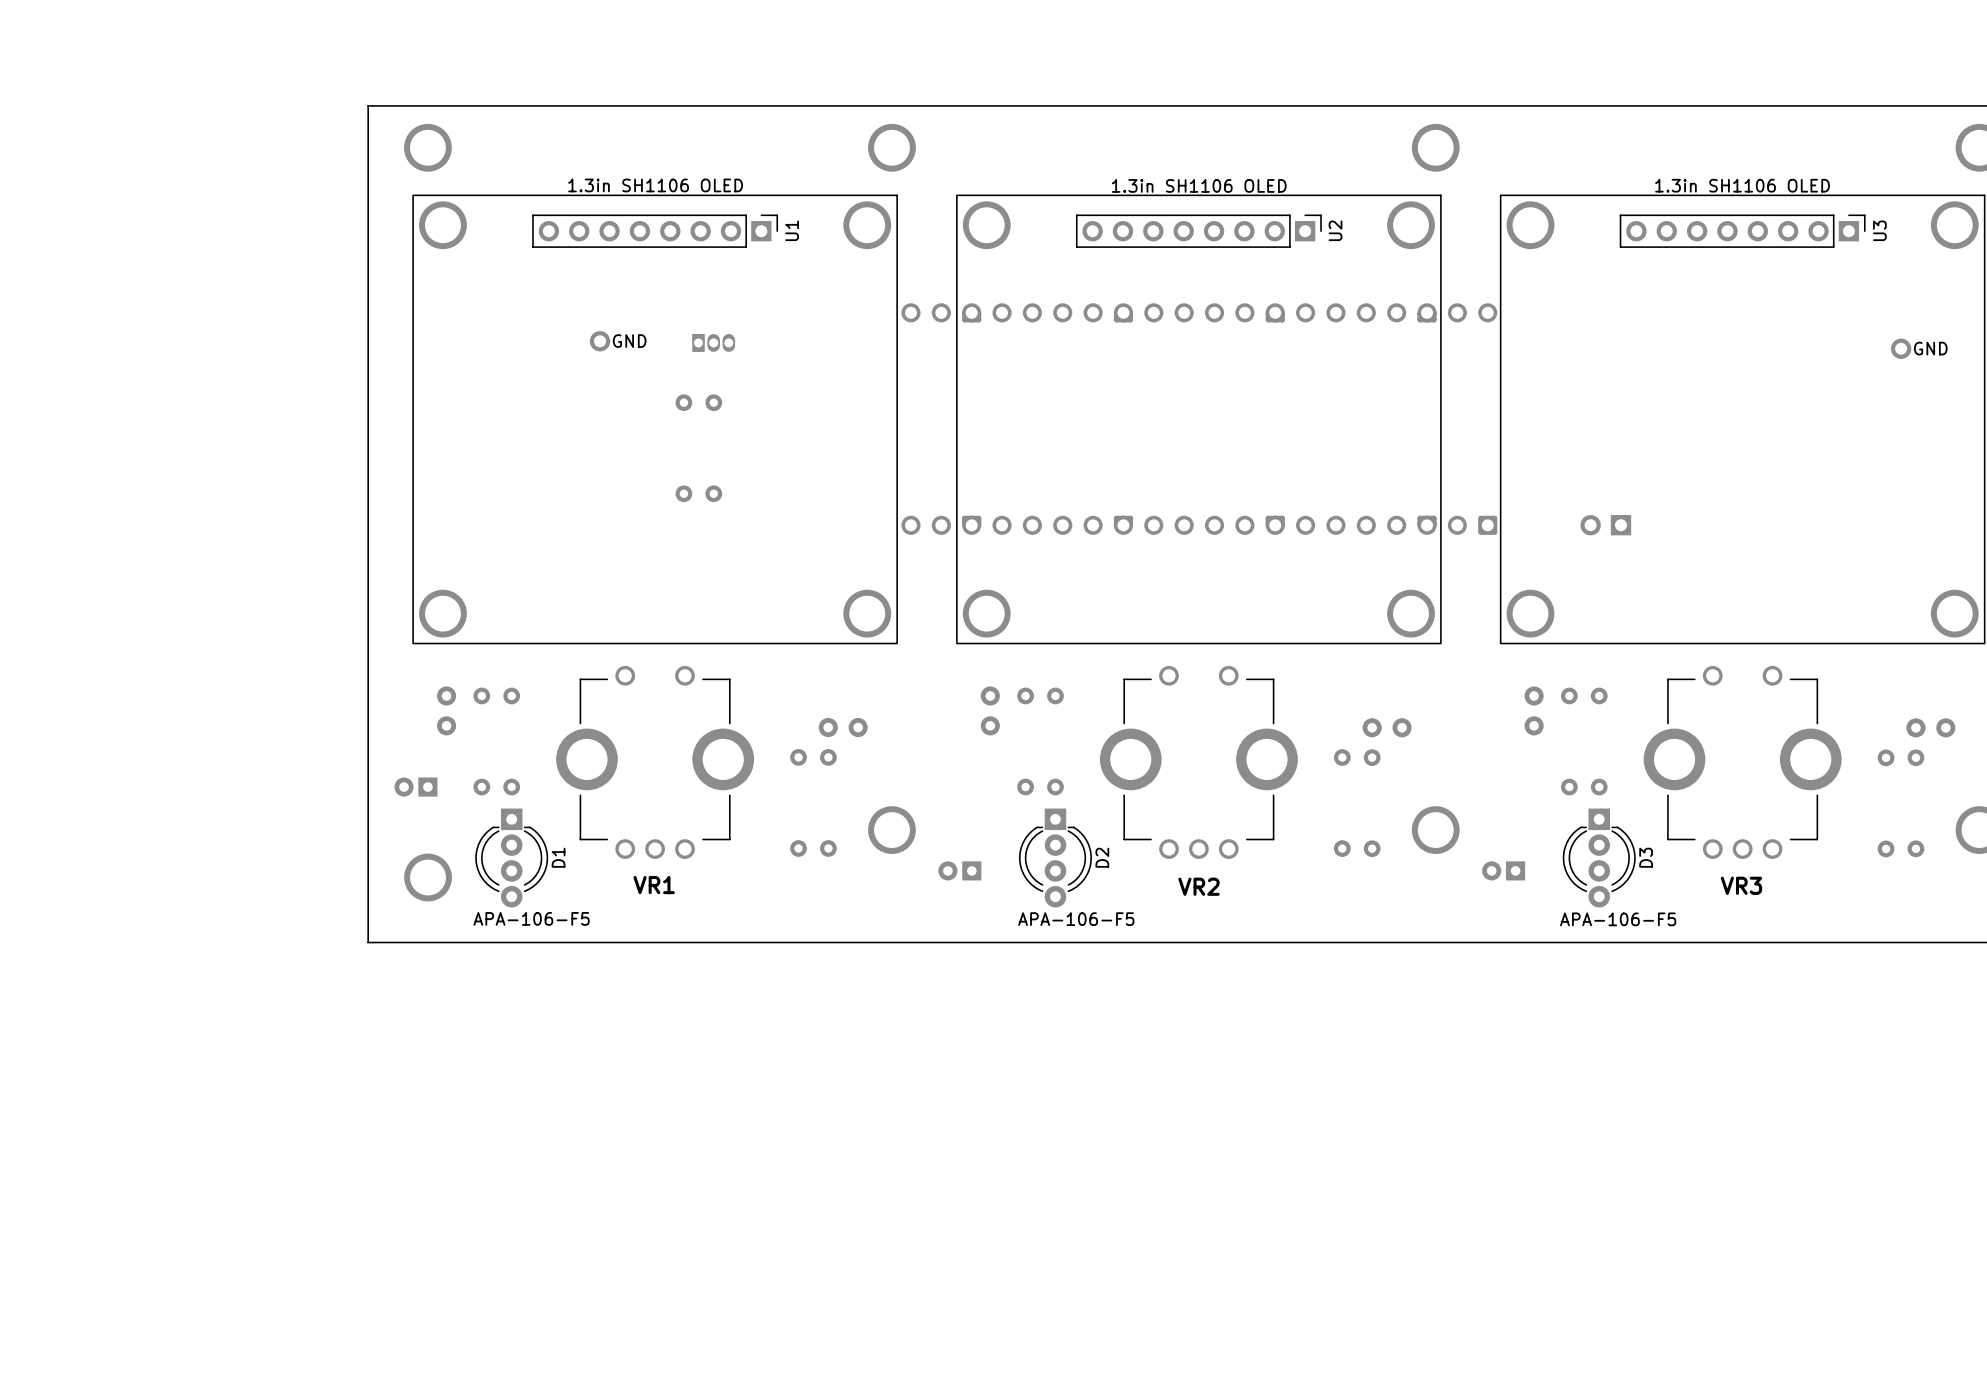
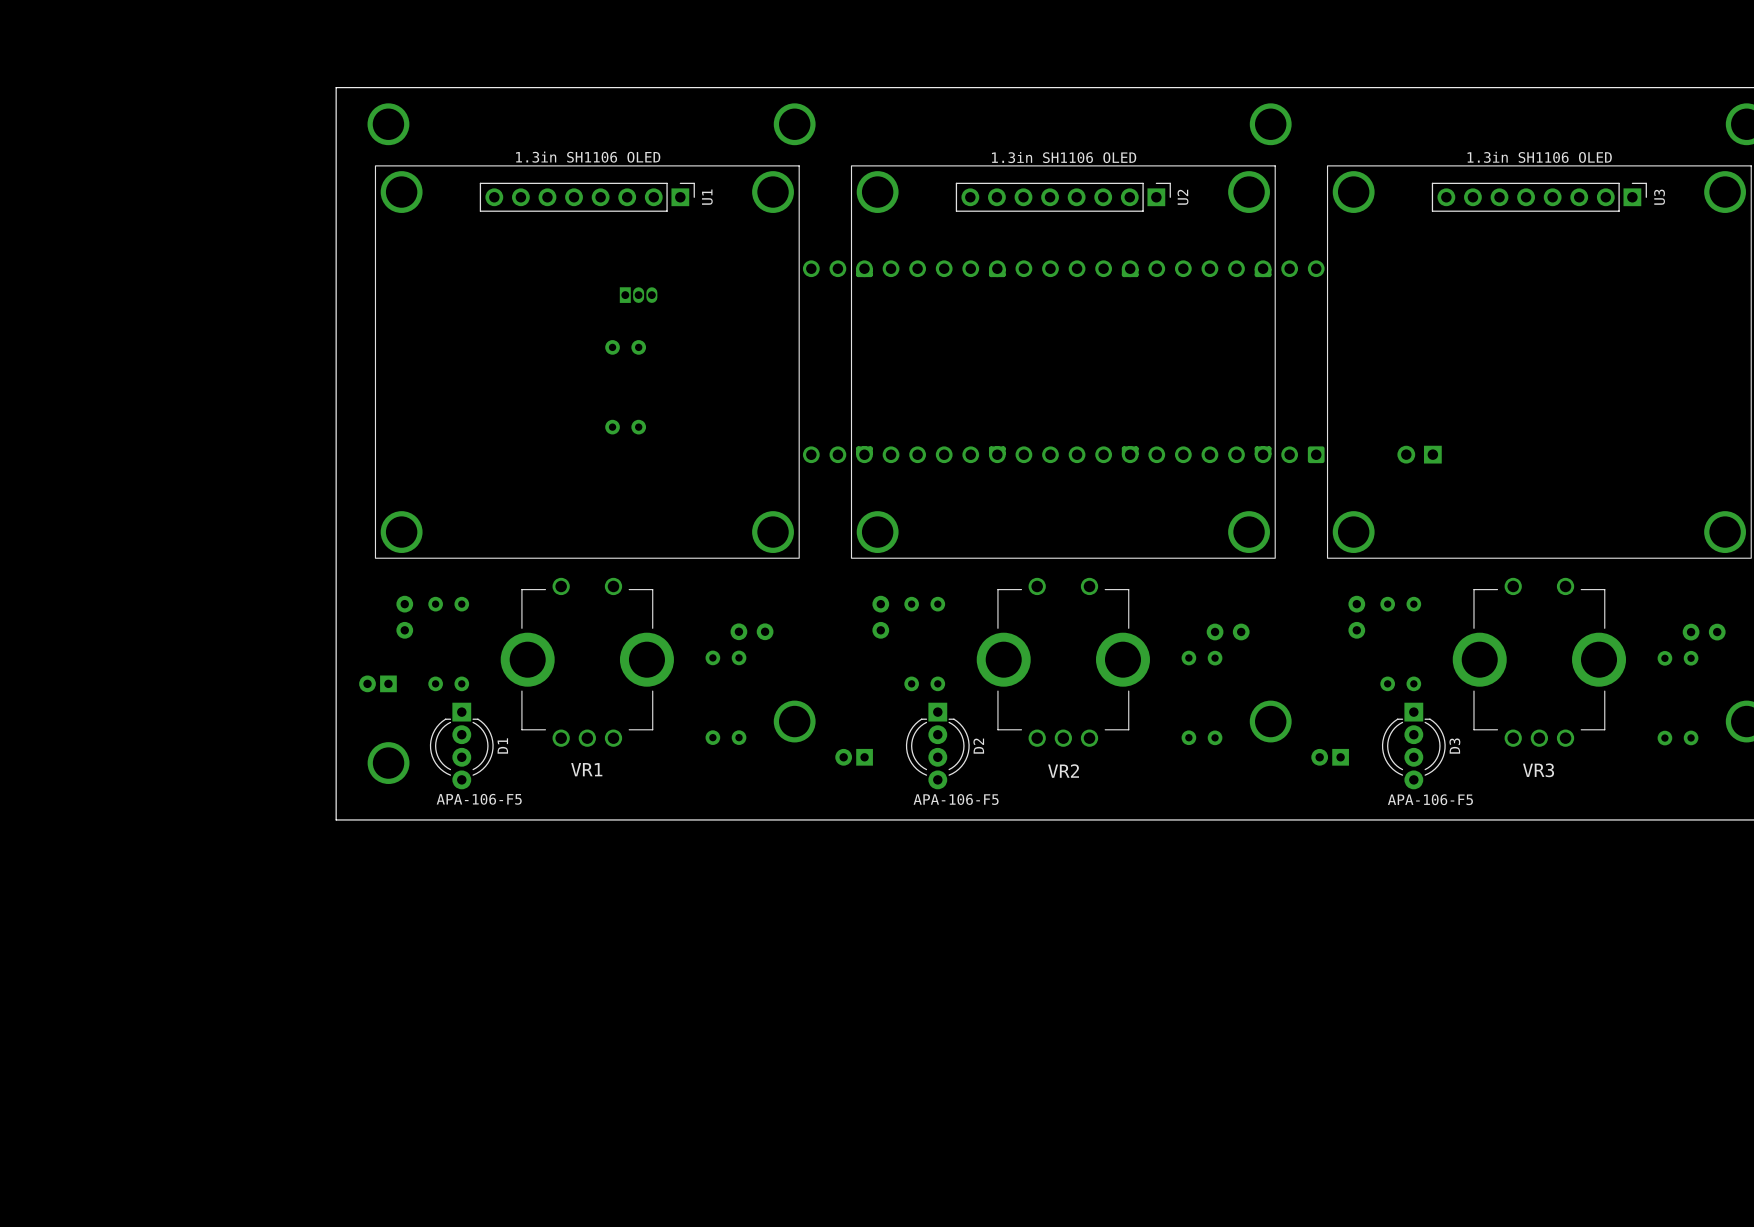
part: (600, 341) -> none
text: GND (629, 341) -> none
part: (1901, 348) -> none
text: GND (1930, 348) -> none

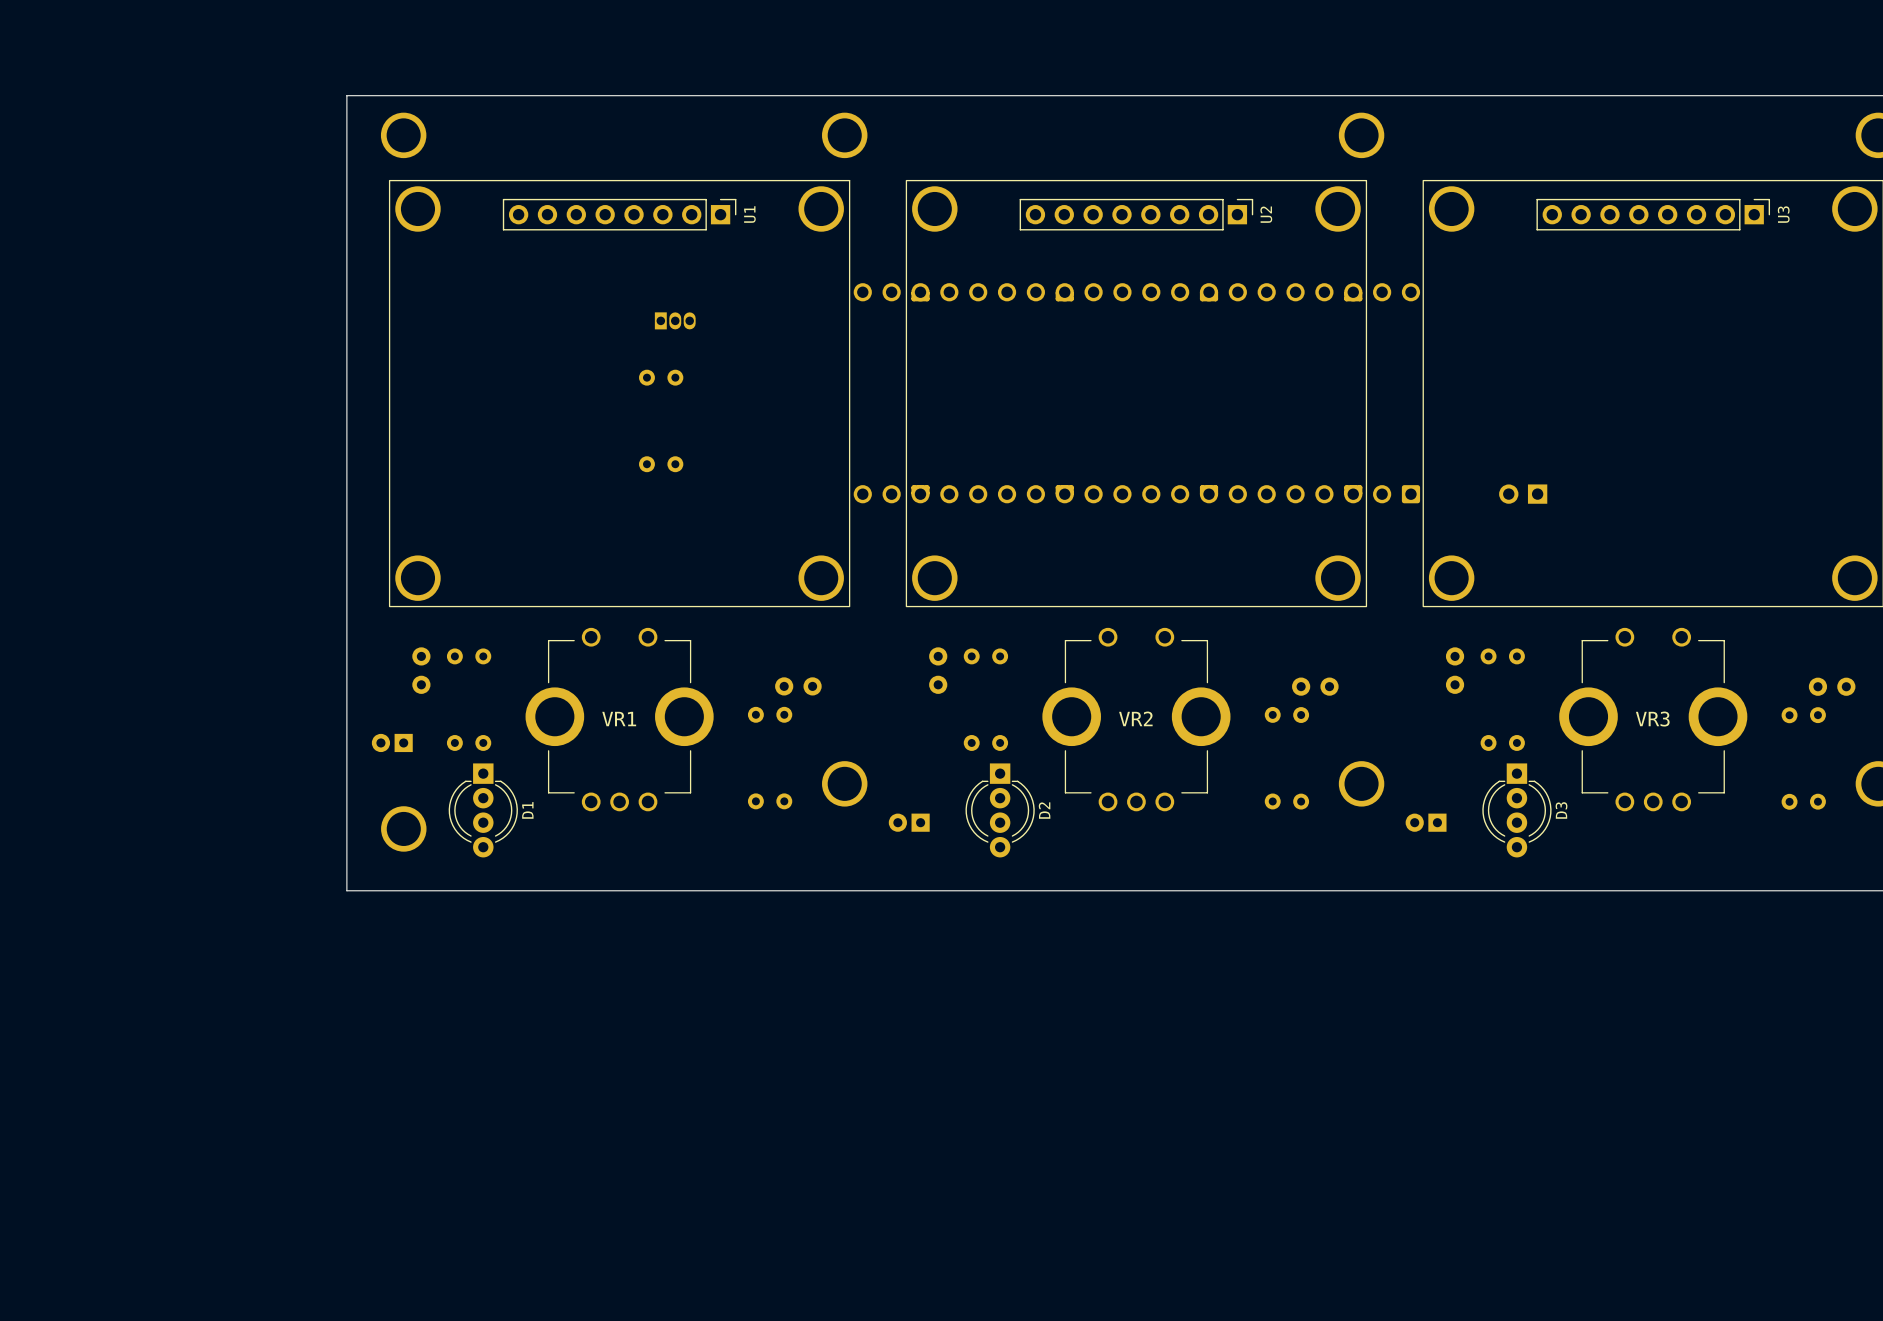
U1 value: 1.3in SH1106 OLED (588, 157) -> none
U2 value: 1.3in SH1106 OLED (1064, 157) -> none
U3 value: 1.3in SH1106 OLED (1539, 157) -> none
VR1 name position: VR1 (586, 769) -> VR1 (619, 719)
VR3 name position: VR3 (1538, 770) -> VR3 (1652, 719)
VR2 name position: VR2 (1063, 771) -> VR2 (1135, 718)
D1 value: APA-106-F5 (479, 799) -> none
D2 value: APA-106-F5 (956, 799) -> none
D3 value: APA-106-F5 (1430, 799) -> none

